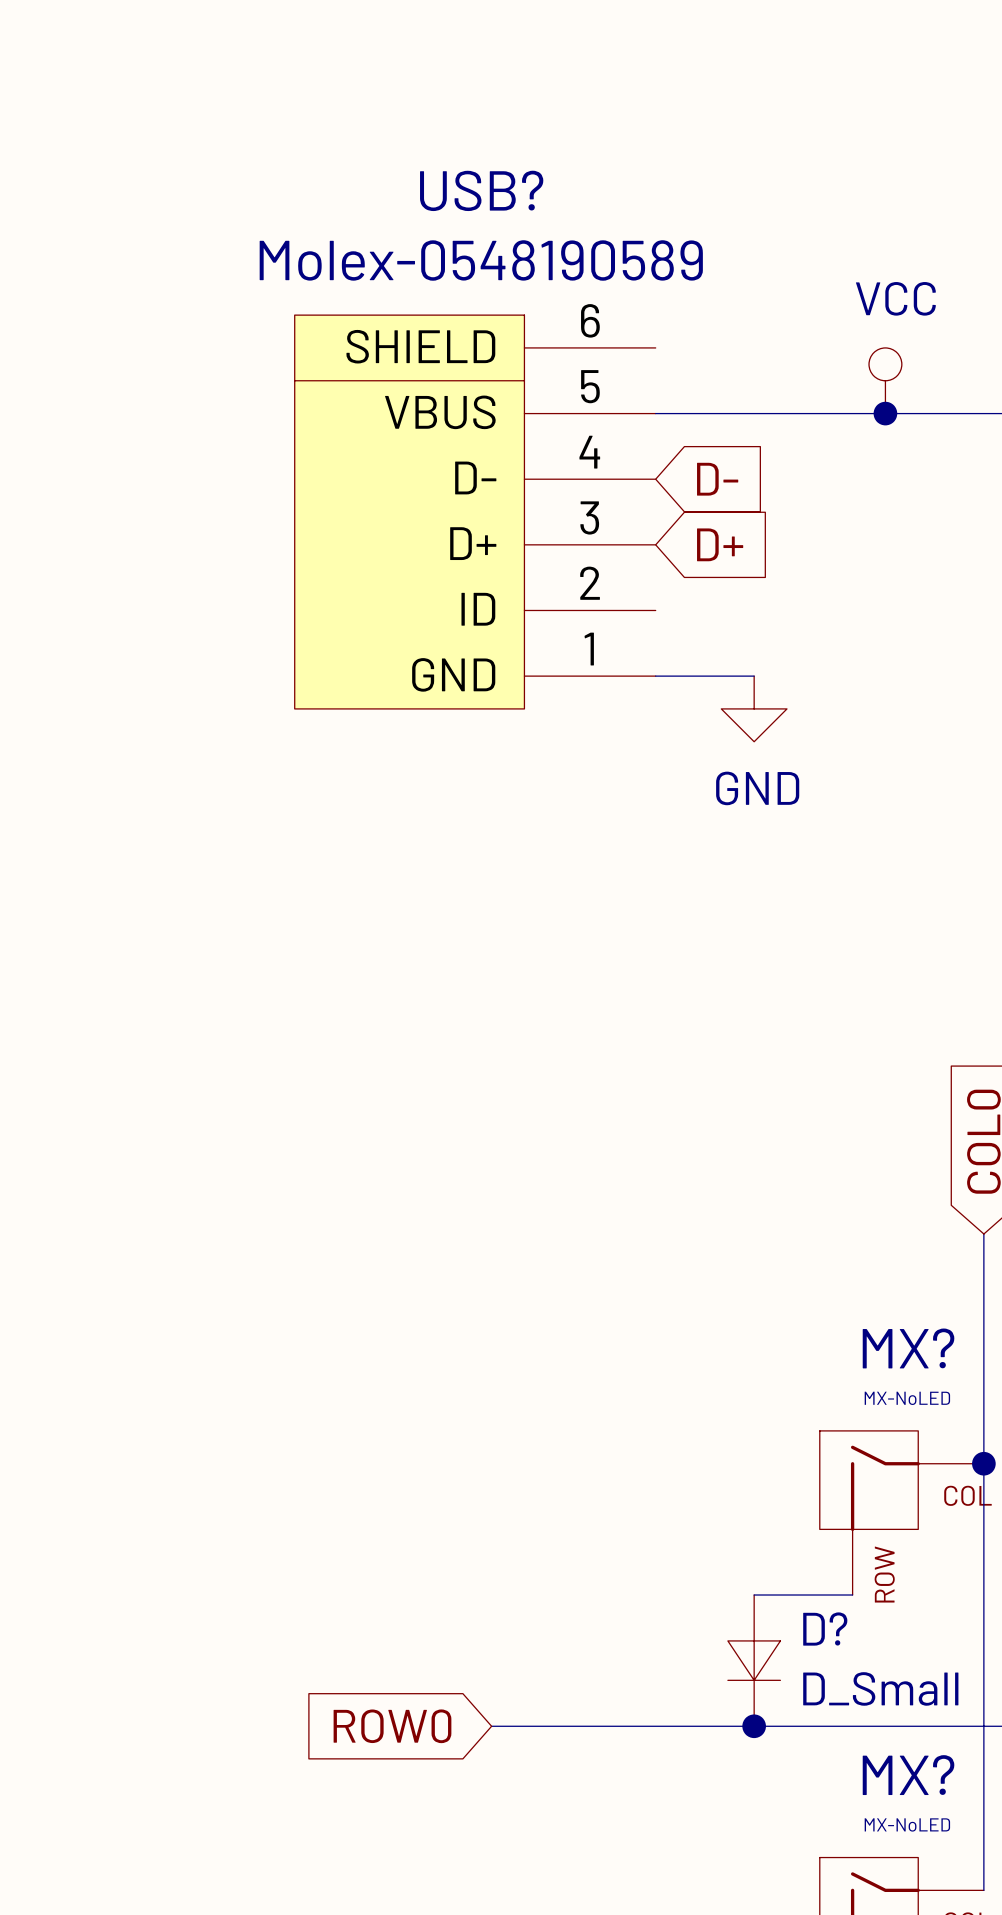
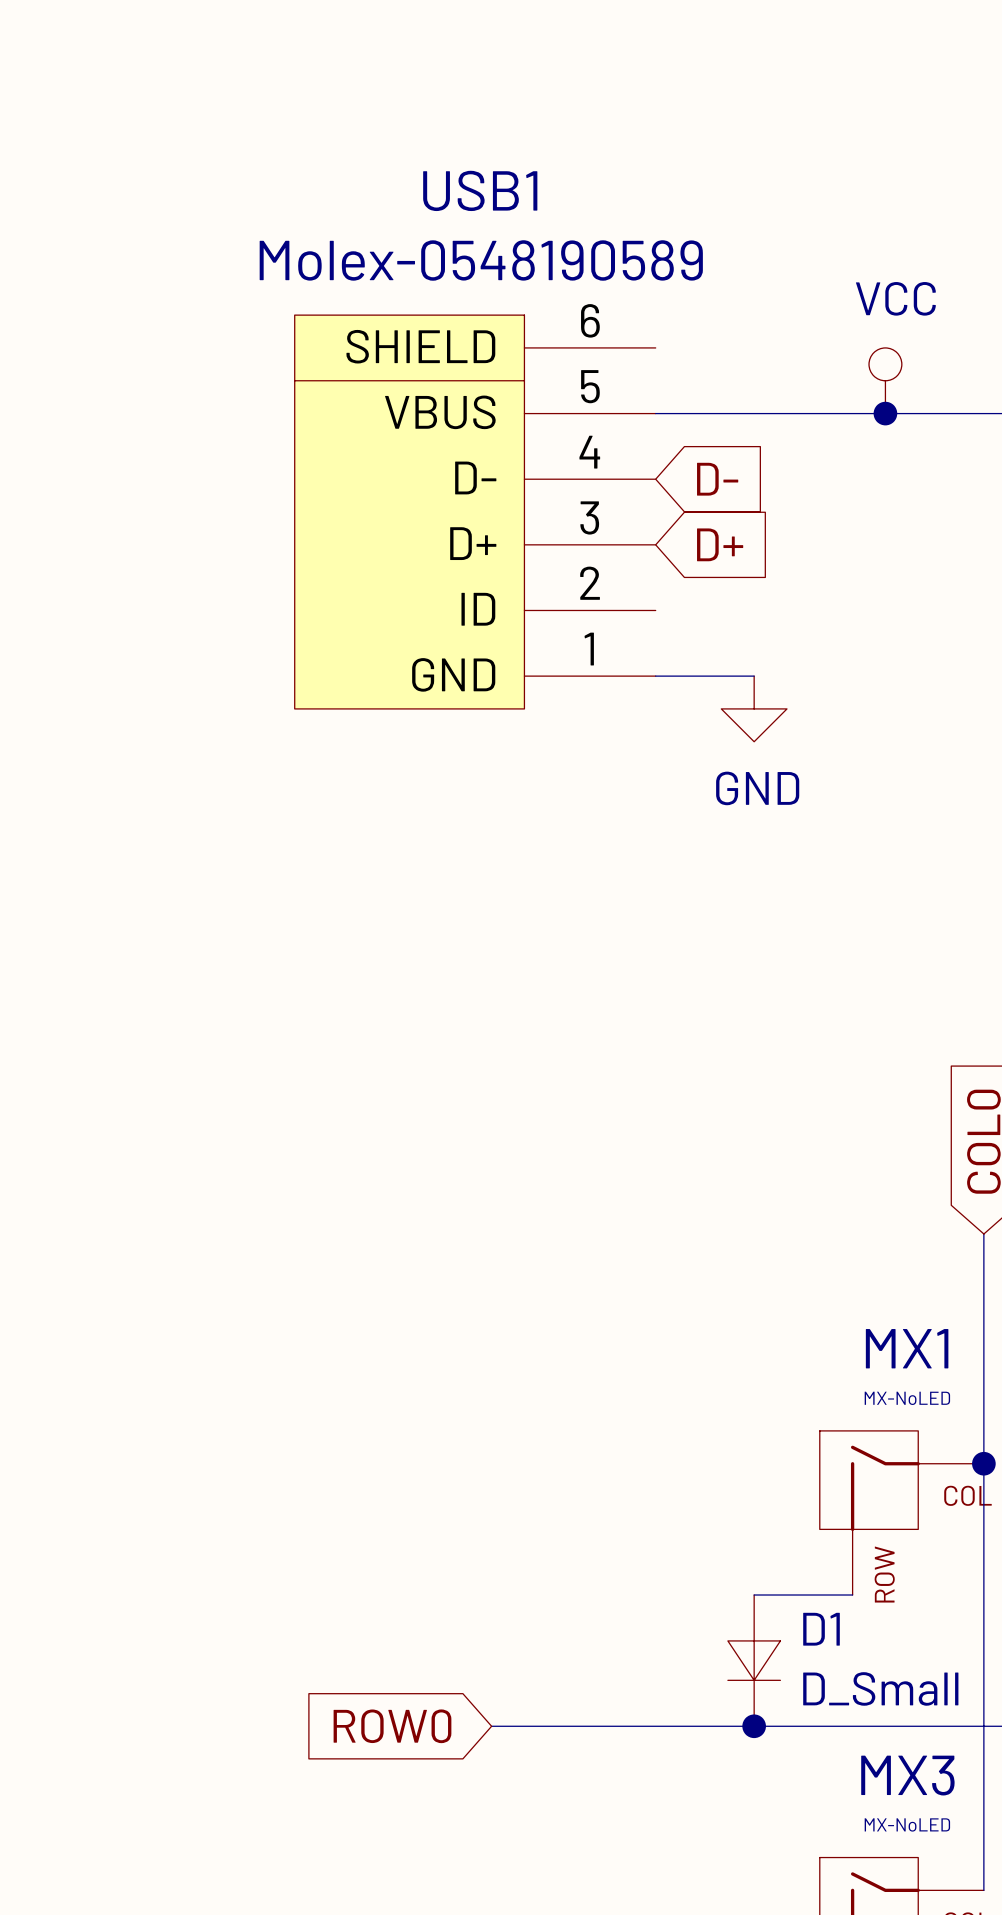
USB? name: USB? (481, 190) -> USB1 (480, 190)
MX? name: MX? (908, 1348) -> MX1 (907, 1348)
D? name: D? (825, 1629) -> D1 (821, 1629)
MX? name: MX? (908, 1775) -> MX3 (907, 1775)

